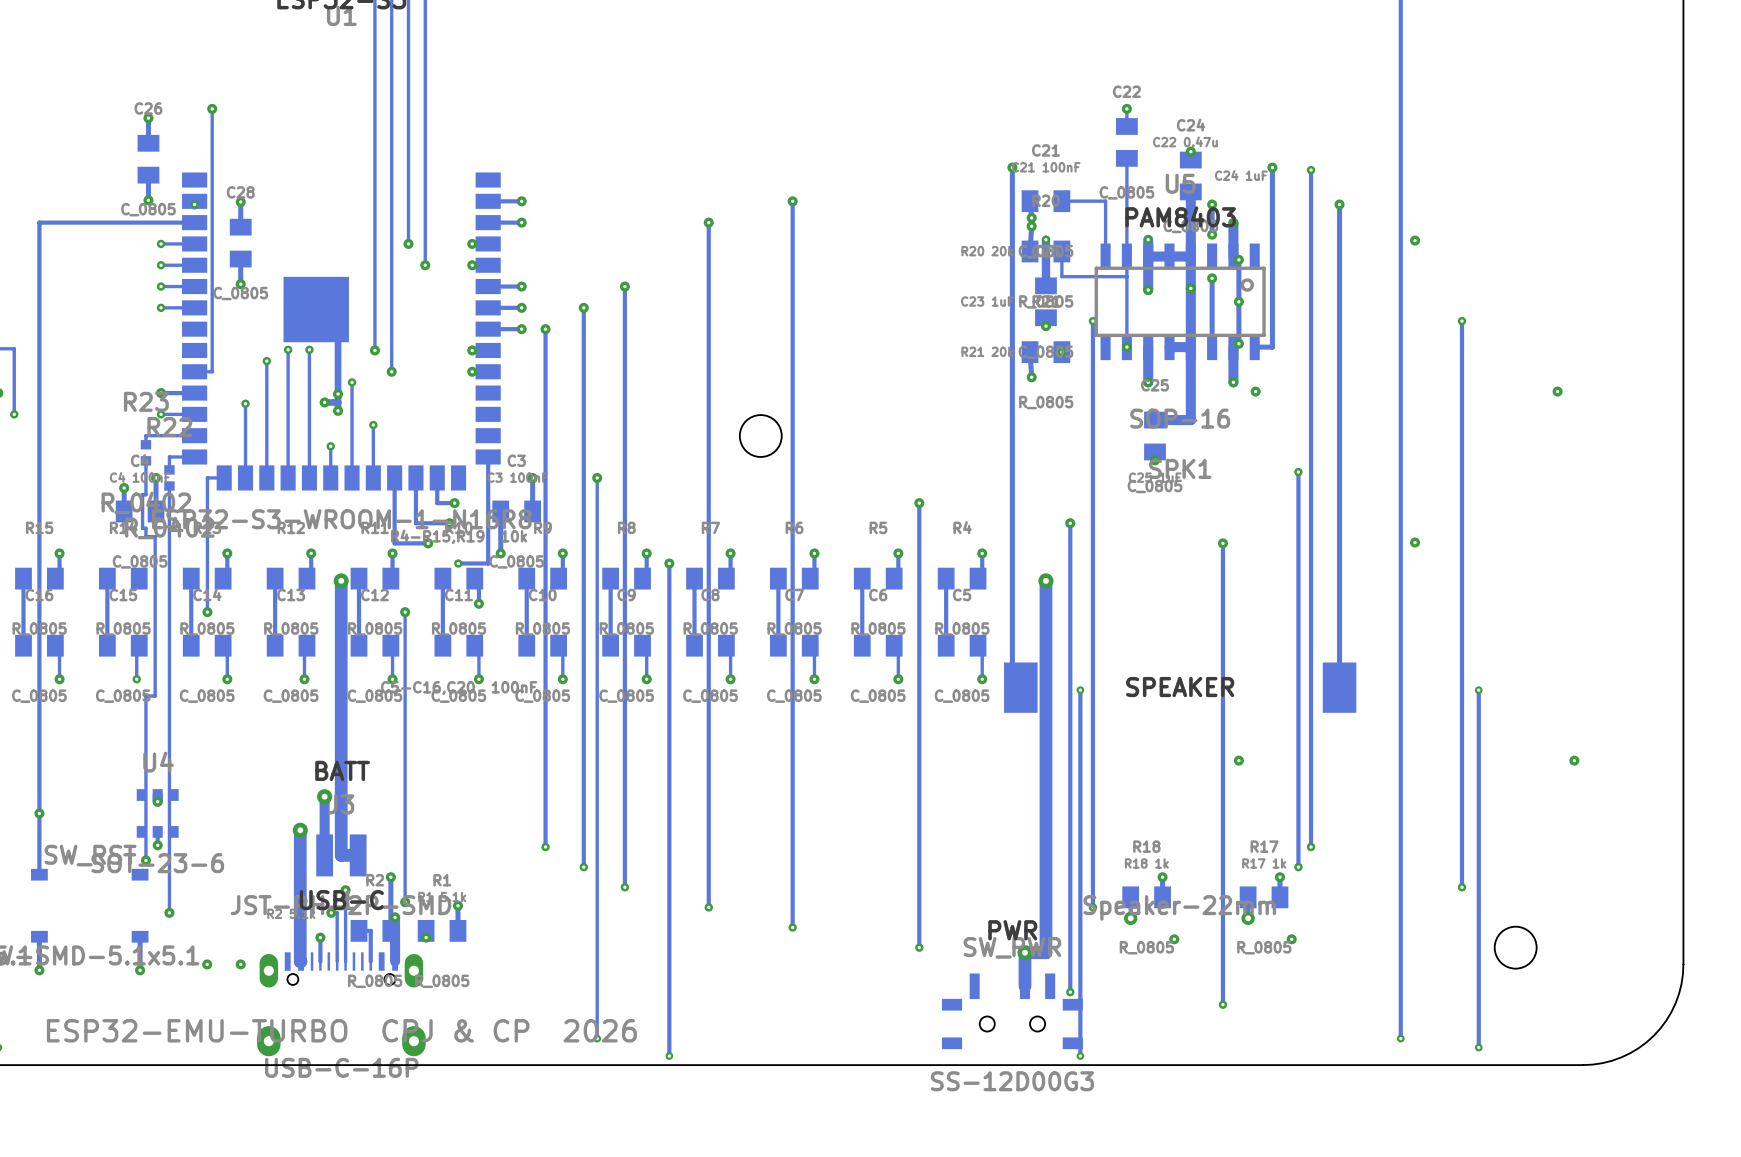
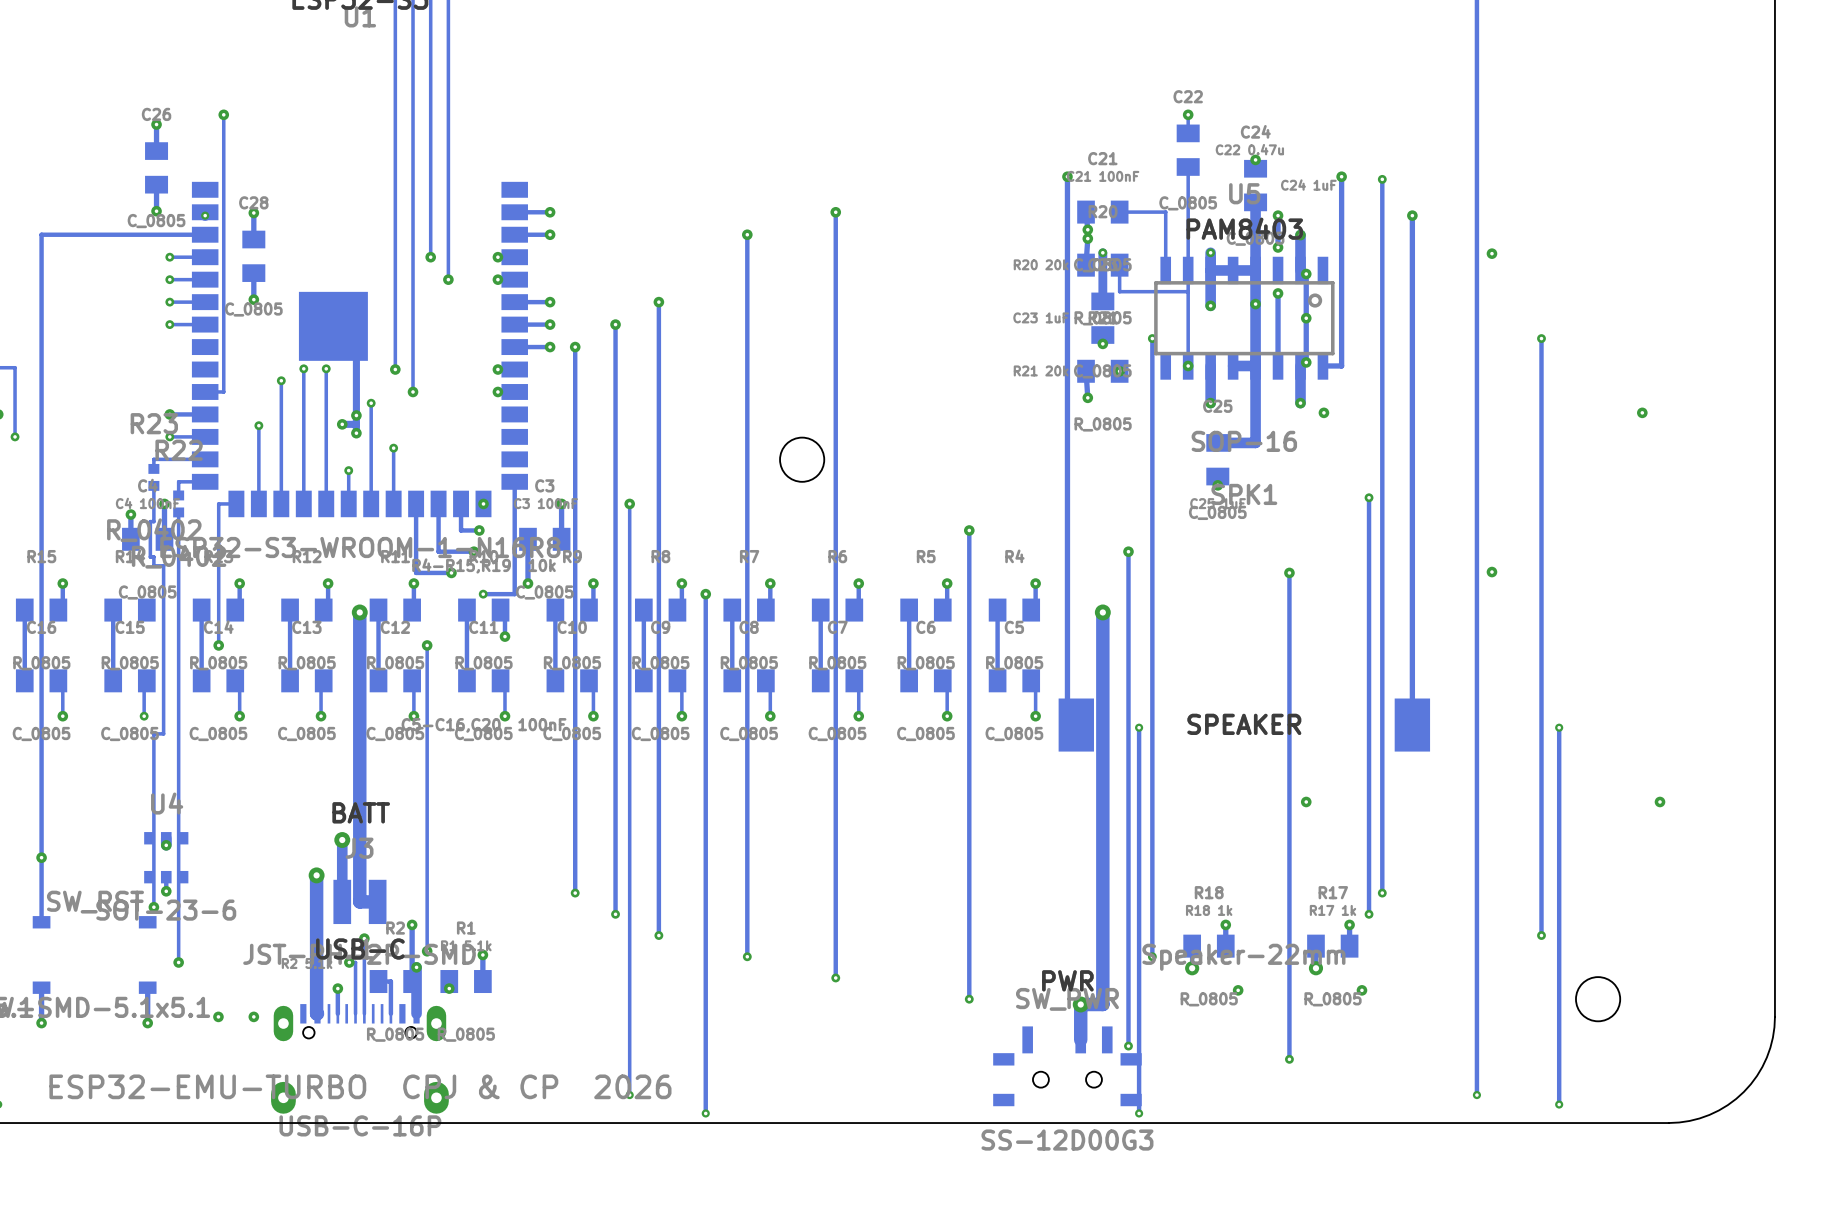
via: none -> (483, 503)

